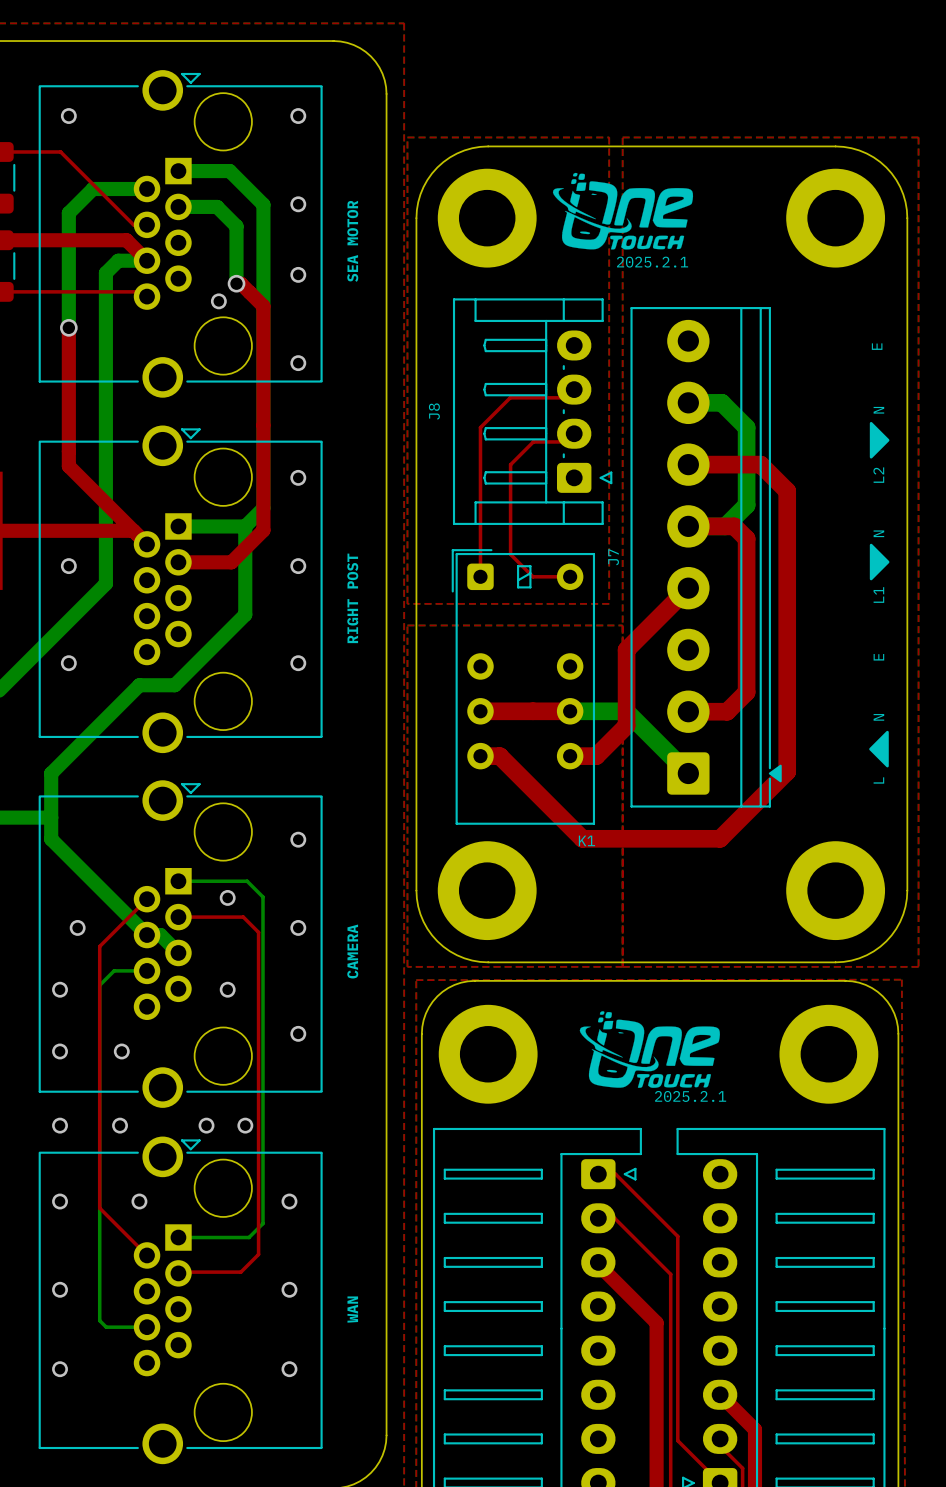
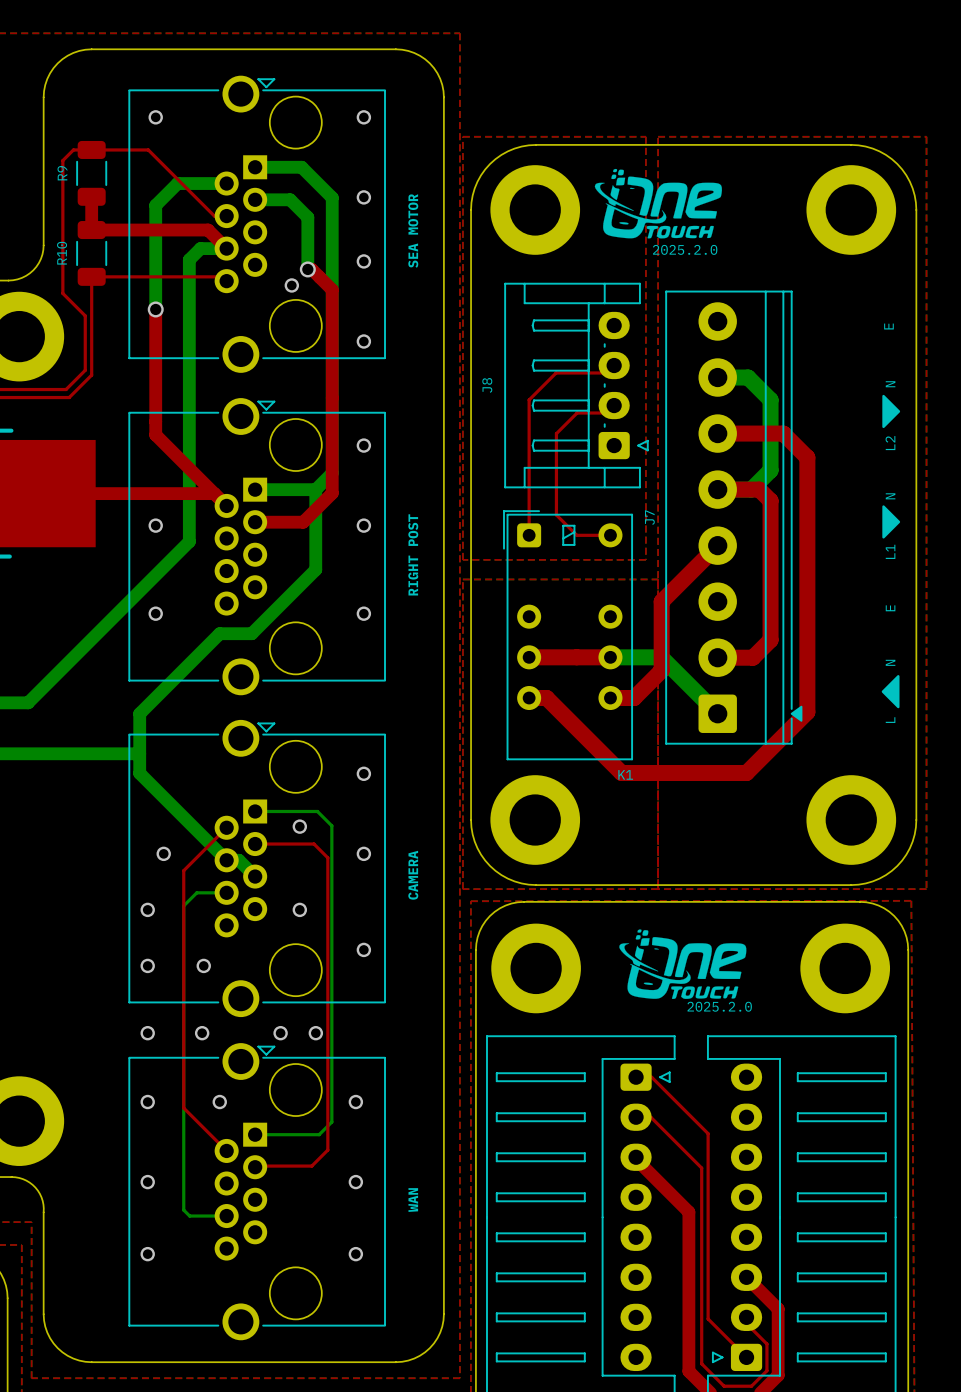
text: 2025.2.1 (652, 262) -> 2025.2.0 (685, 249)
text: 2025.2.1 (690, 1096) -> 2025.2.0 (719, 1006)

